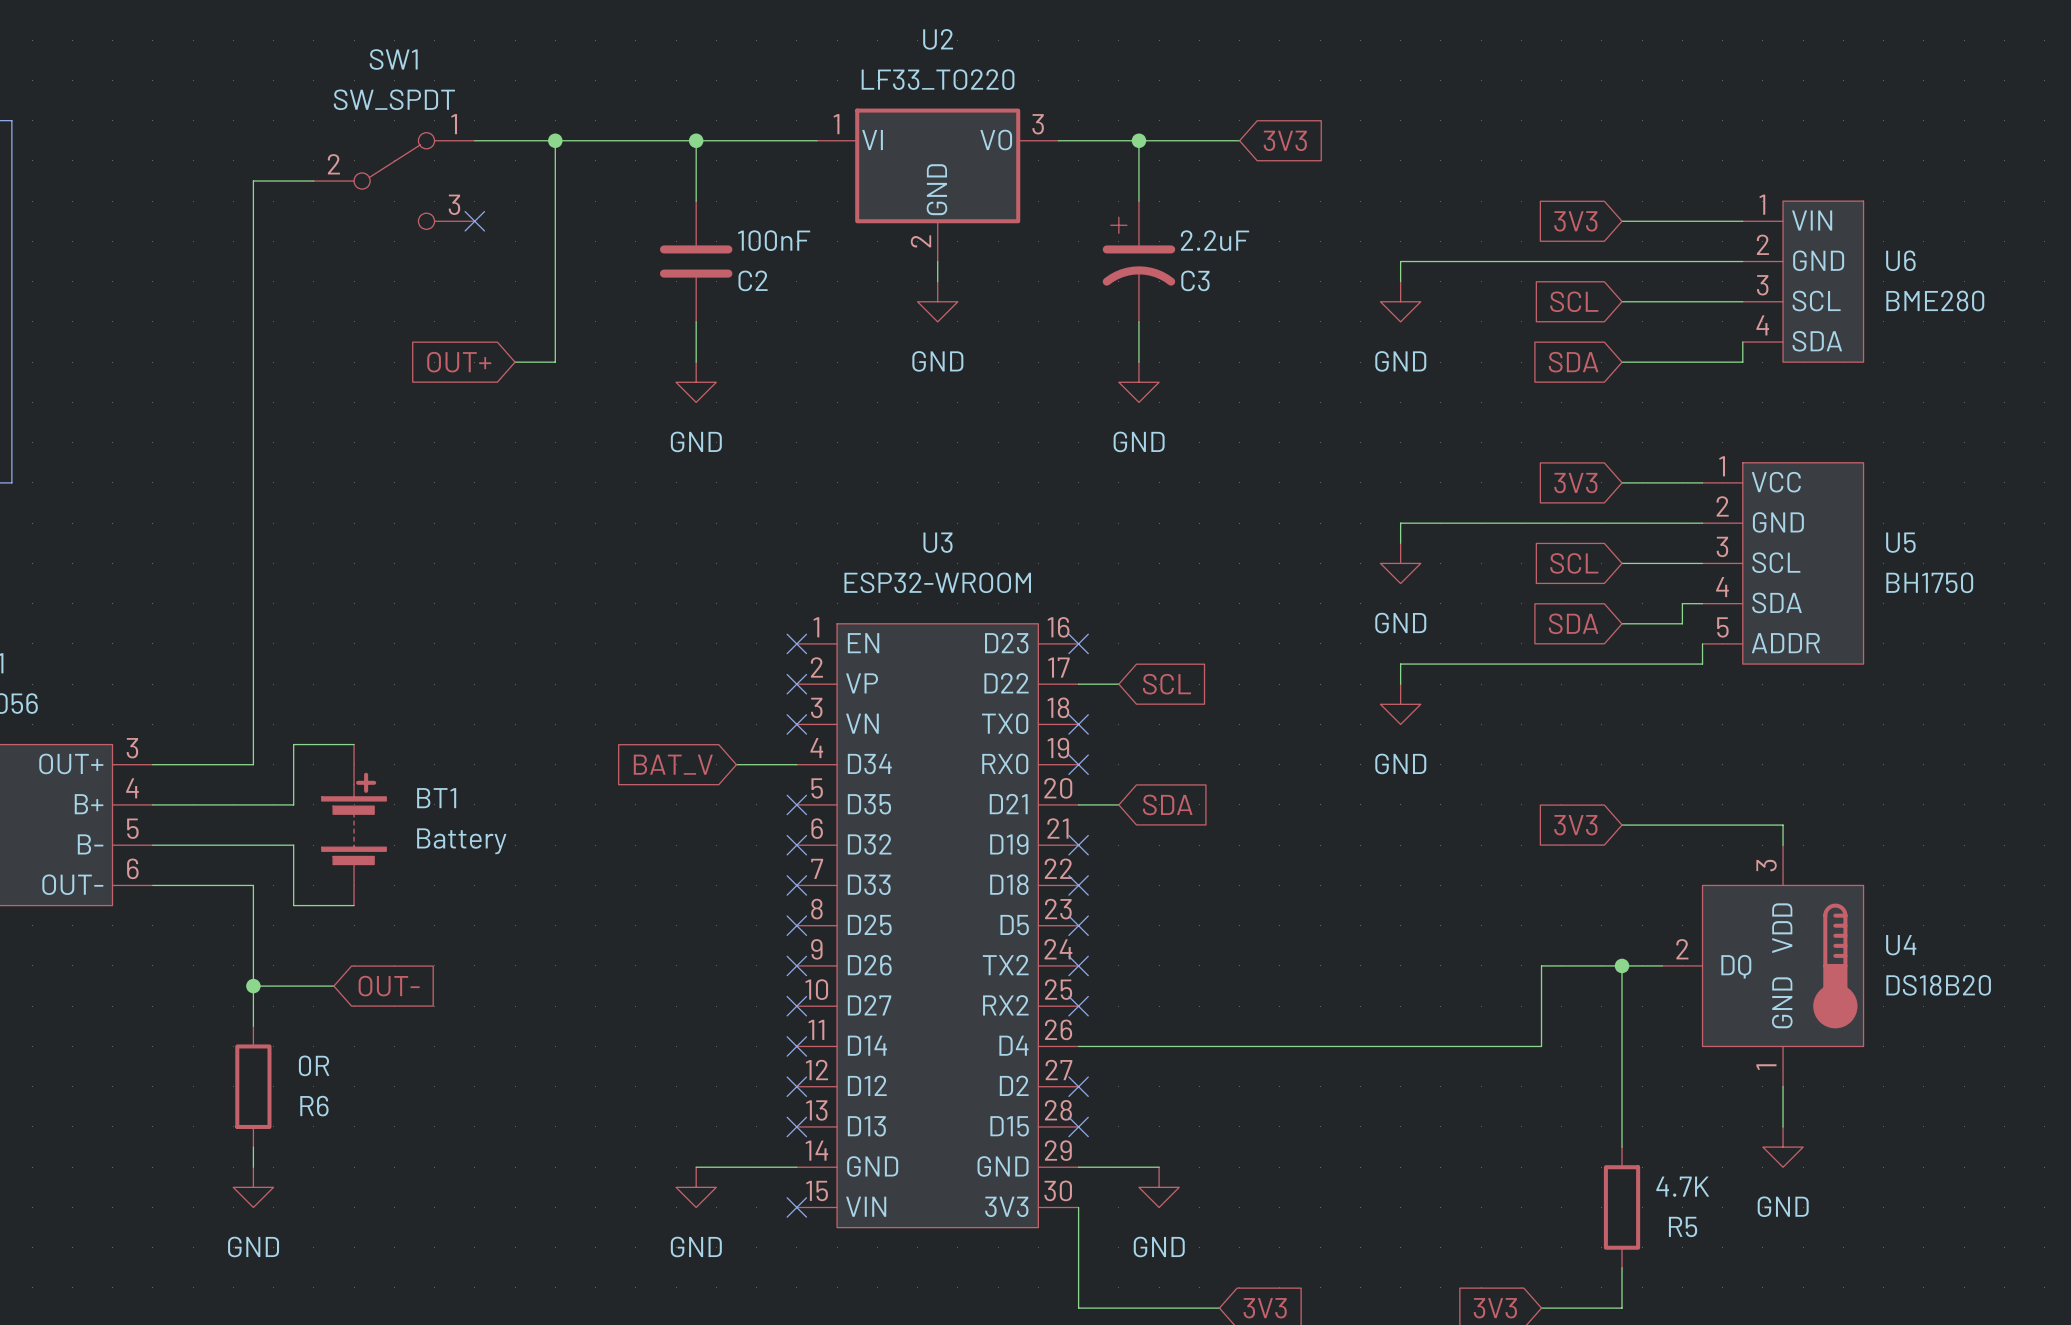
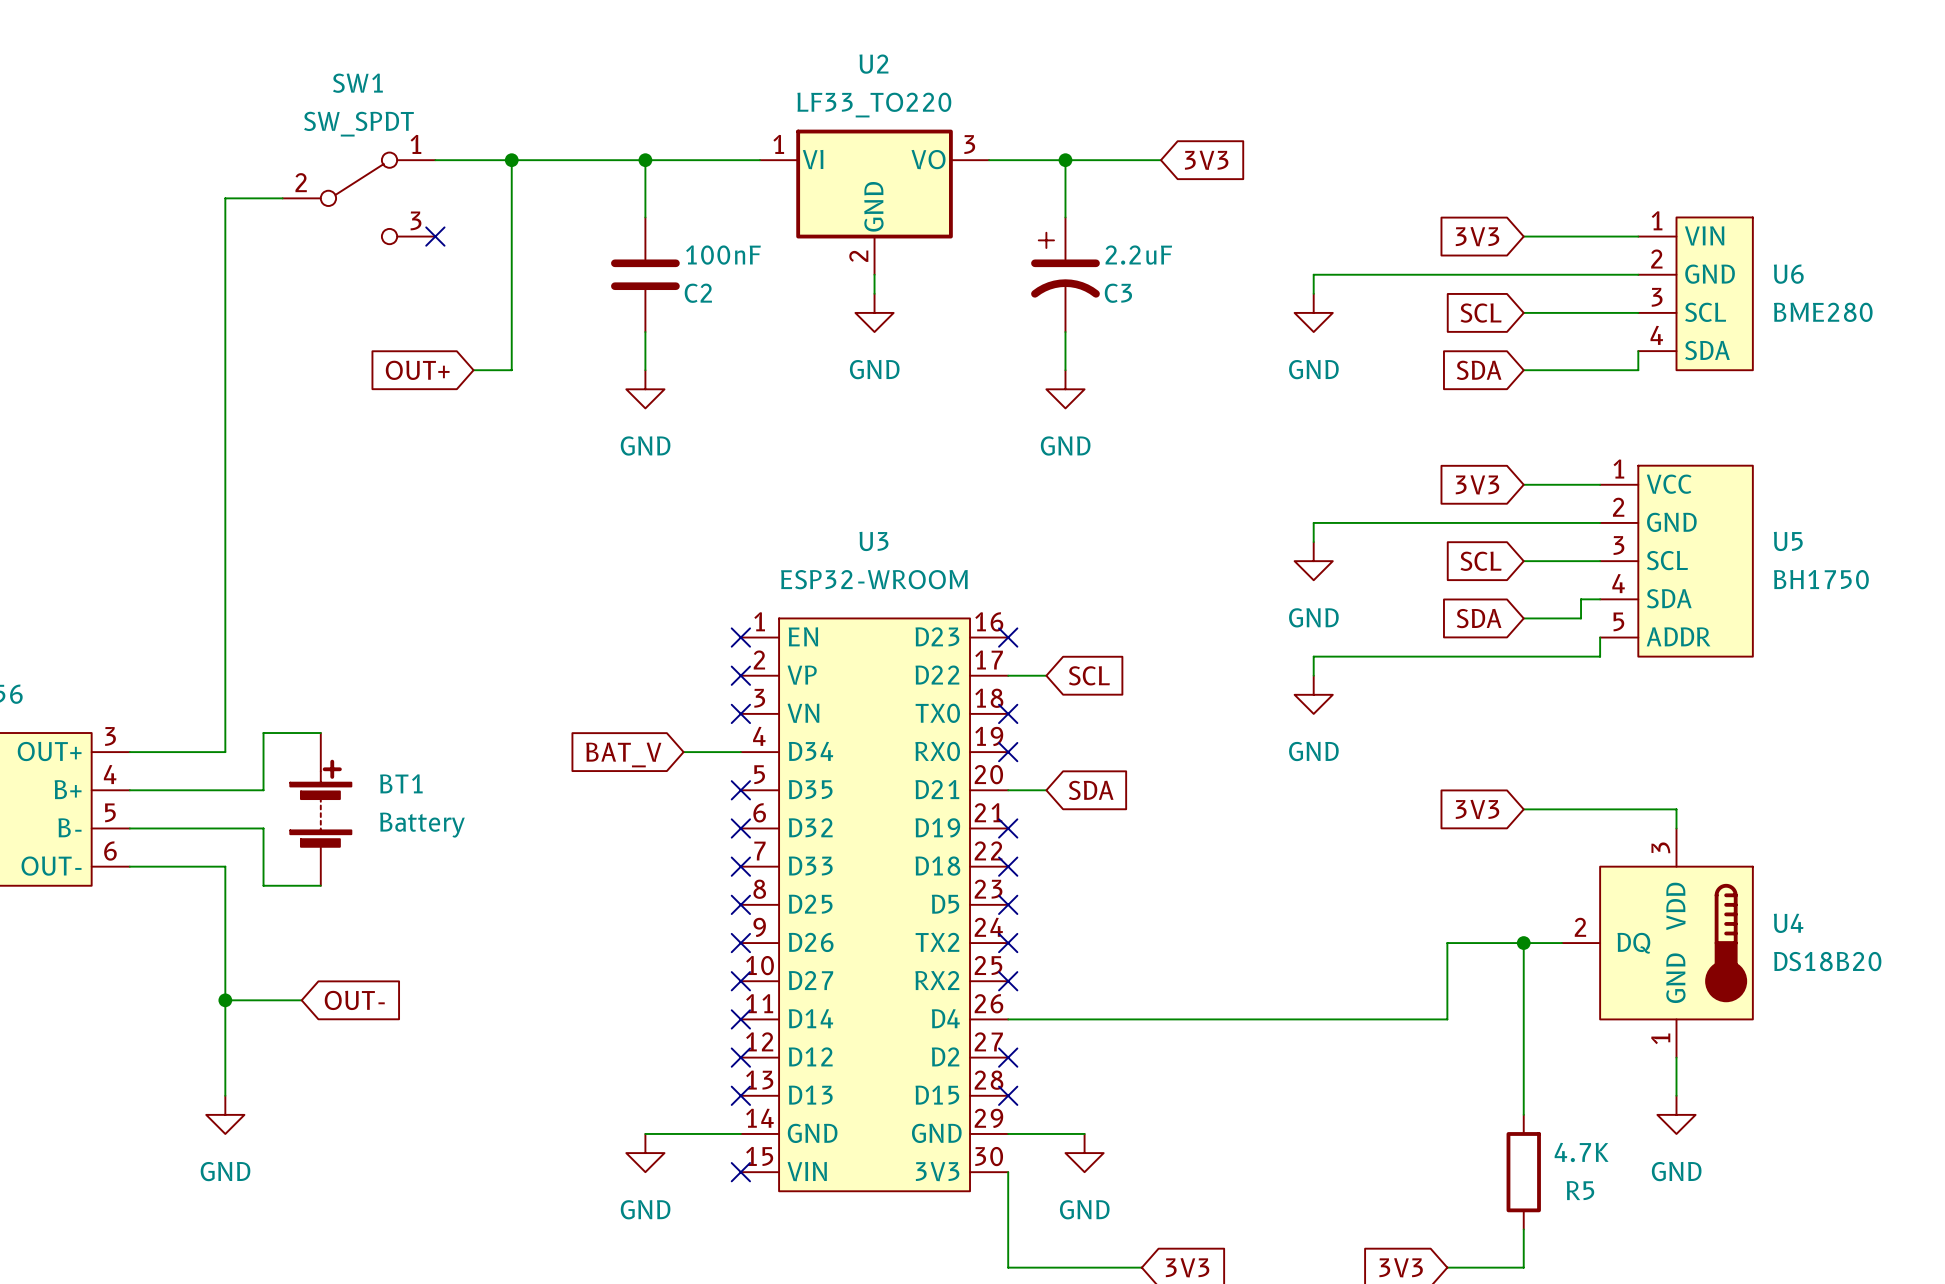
wire: (253, 986) (333, 986) -> none
junction position: (253, 986) -> (225, 1000)
global label position: OUT- (389, 986) -> OUT- (354, 1000)
wire: none -> (301, 1000) (225, 1000) (225, 1095)
R6: 0R (253, 1086) -> none
wire: (253, 1147) (253, 1167) -> none
power symbol position: GND (253, 1187) -> GND (225, 1114)

